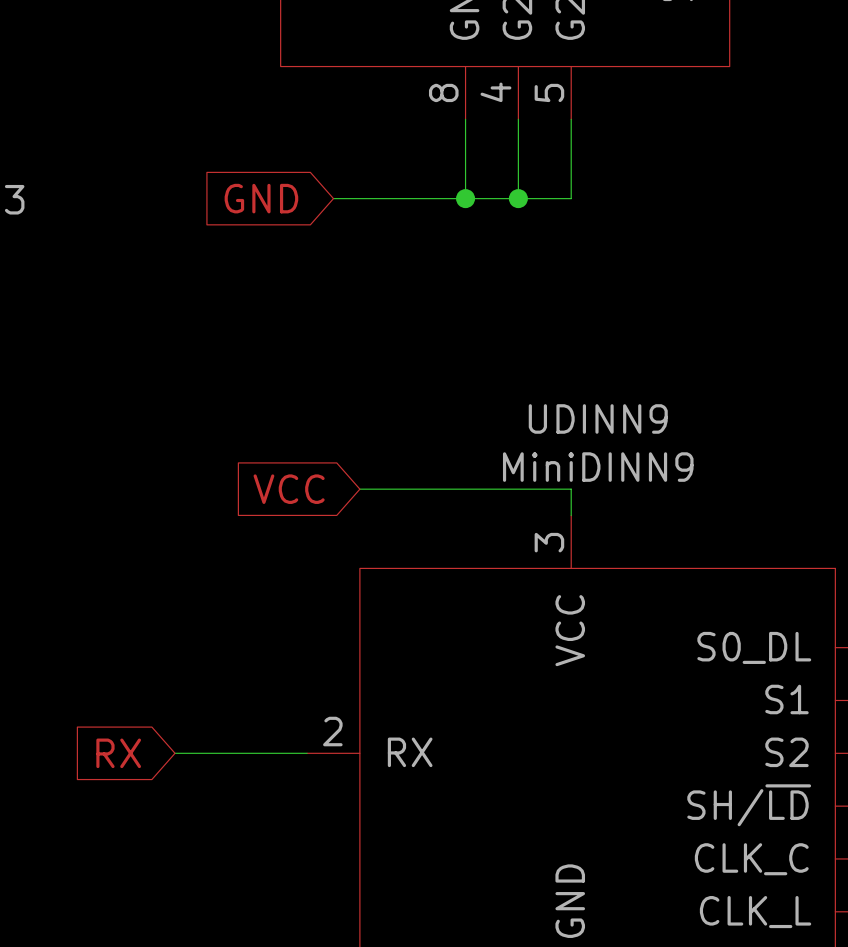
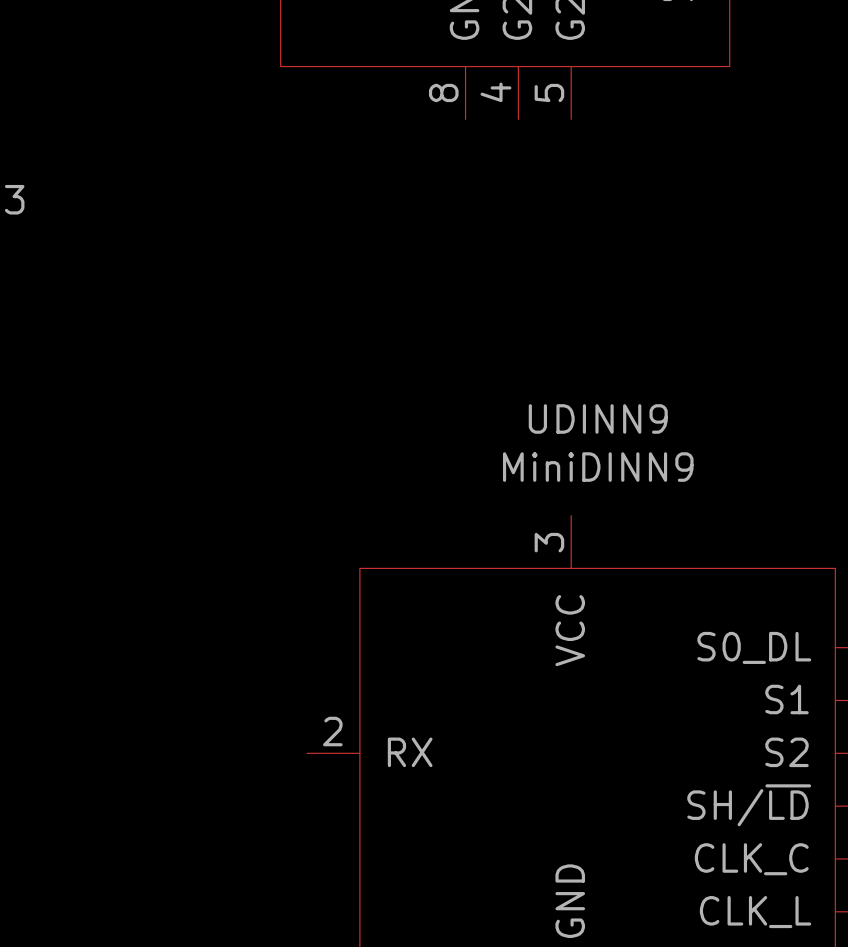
wire: (465, 119) (465, 198) -> none
wire: (518, 119) (518, 198) -> none
wire: (571, 119) (571, 198) (333, 198) -> none
global label: GND (261, 198) -> none
junction: (465, 198) -> none
junction: (518, 198) -> none
global label: VCC (289, 489) -> none
wire: (359, 489) (571, 489) (571, 515) -> none
global label: RX (118, 753) -> none
wire: (175, 753) (307, 753) -> none

